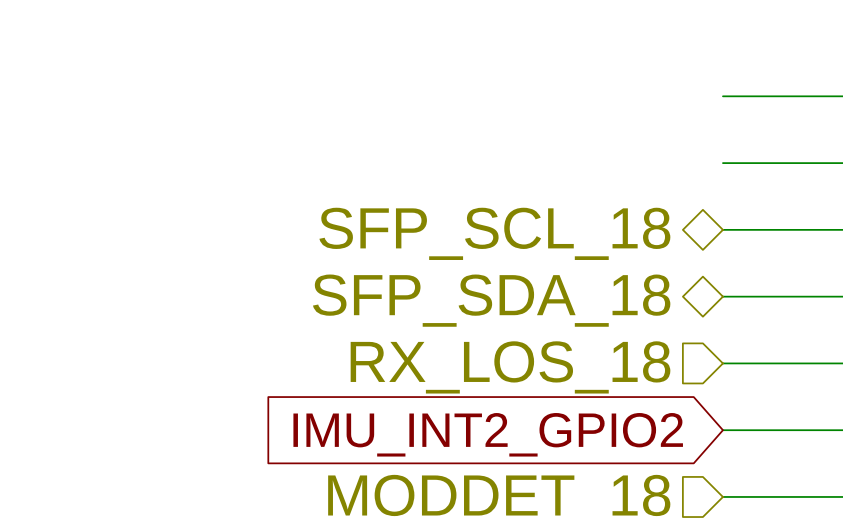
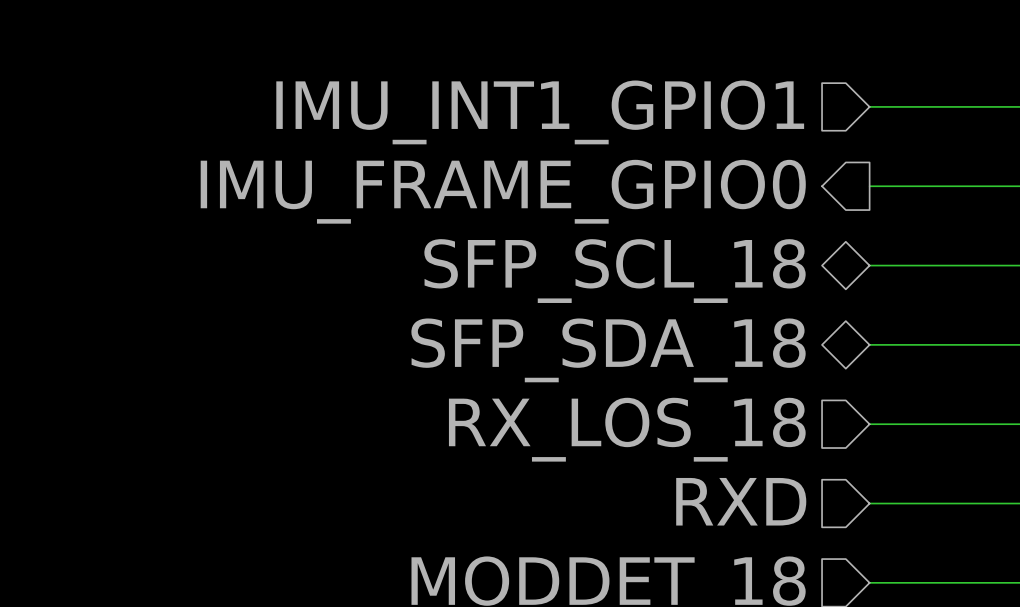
hierarchical label: none -> IMU_INT1_GPIO1 (540, 112)
hierarchical label: none -> IMU_FRAME_GPIO0 (503, 191)
hierarchical label: none -> RXD (741, 501)
global label: IMU_INT2_GPIO2 (488, 434) -> none

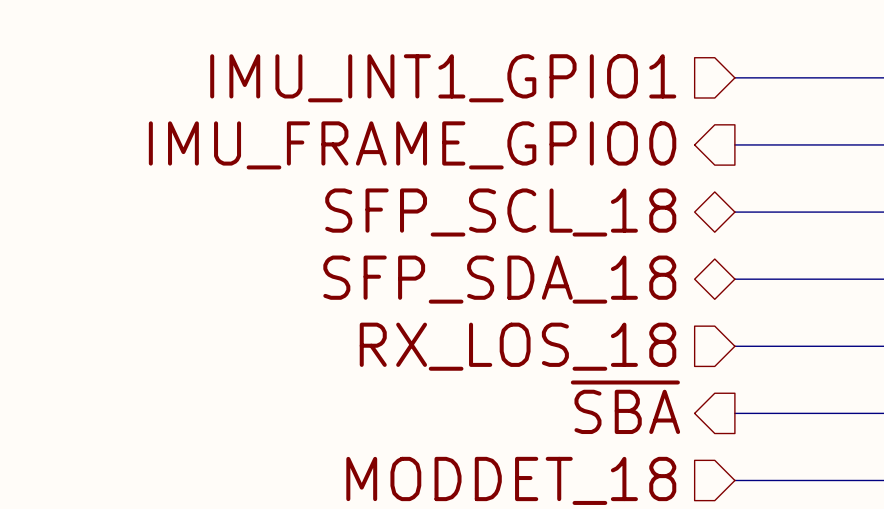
hierarchical label shape: input (741, 501) -> output (625, 407)
hierarchical label: RXD (741, 501) -> ~{SBA} (625, 407)

